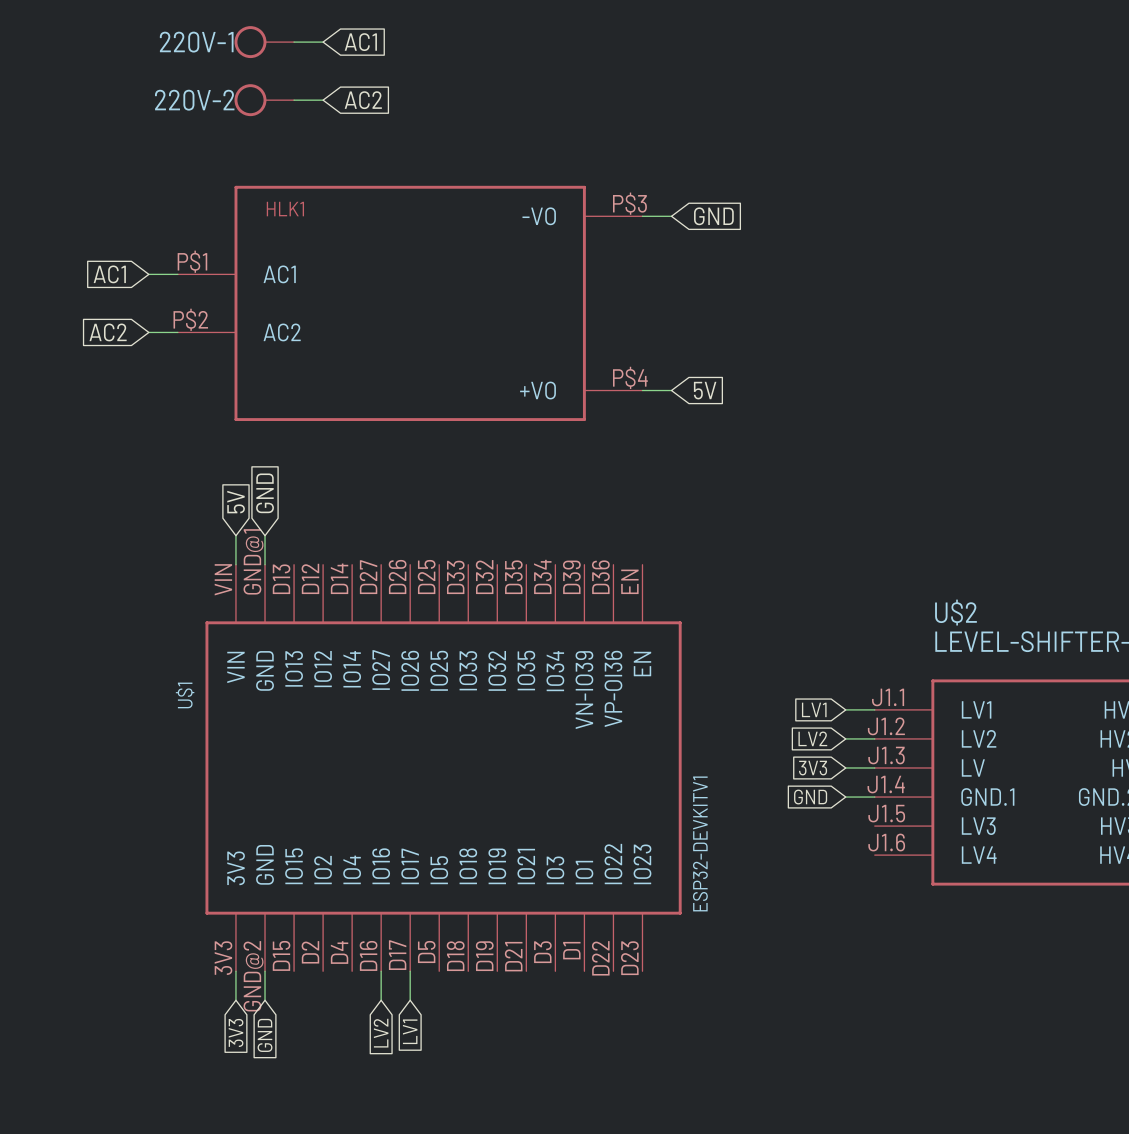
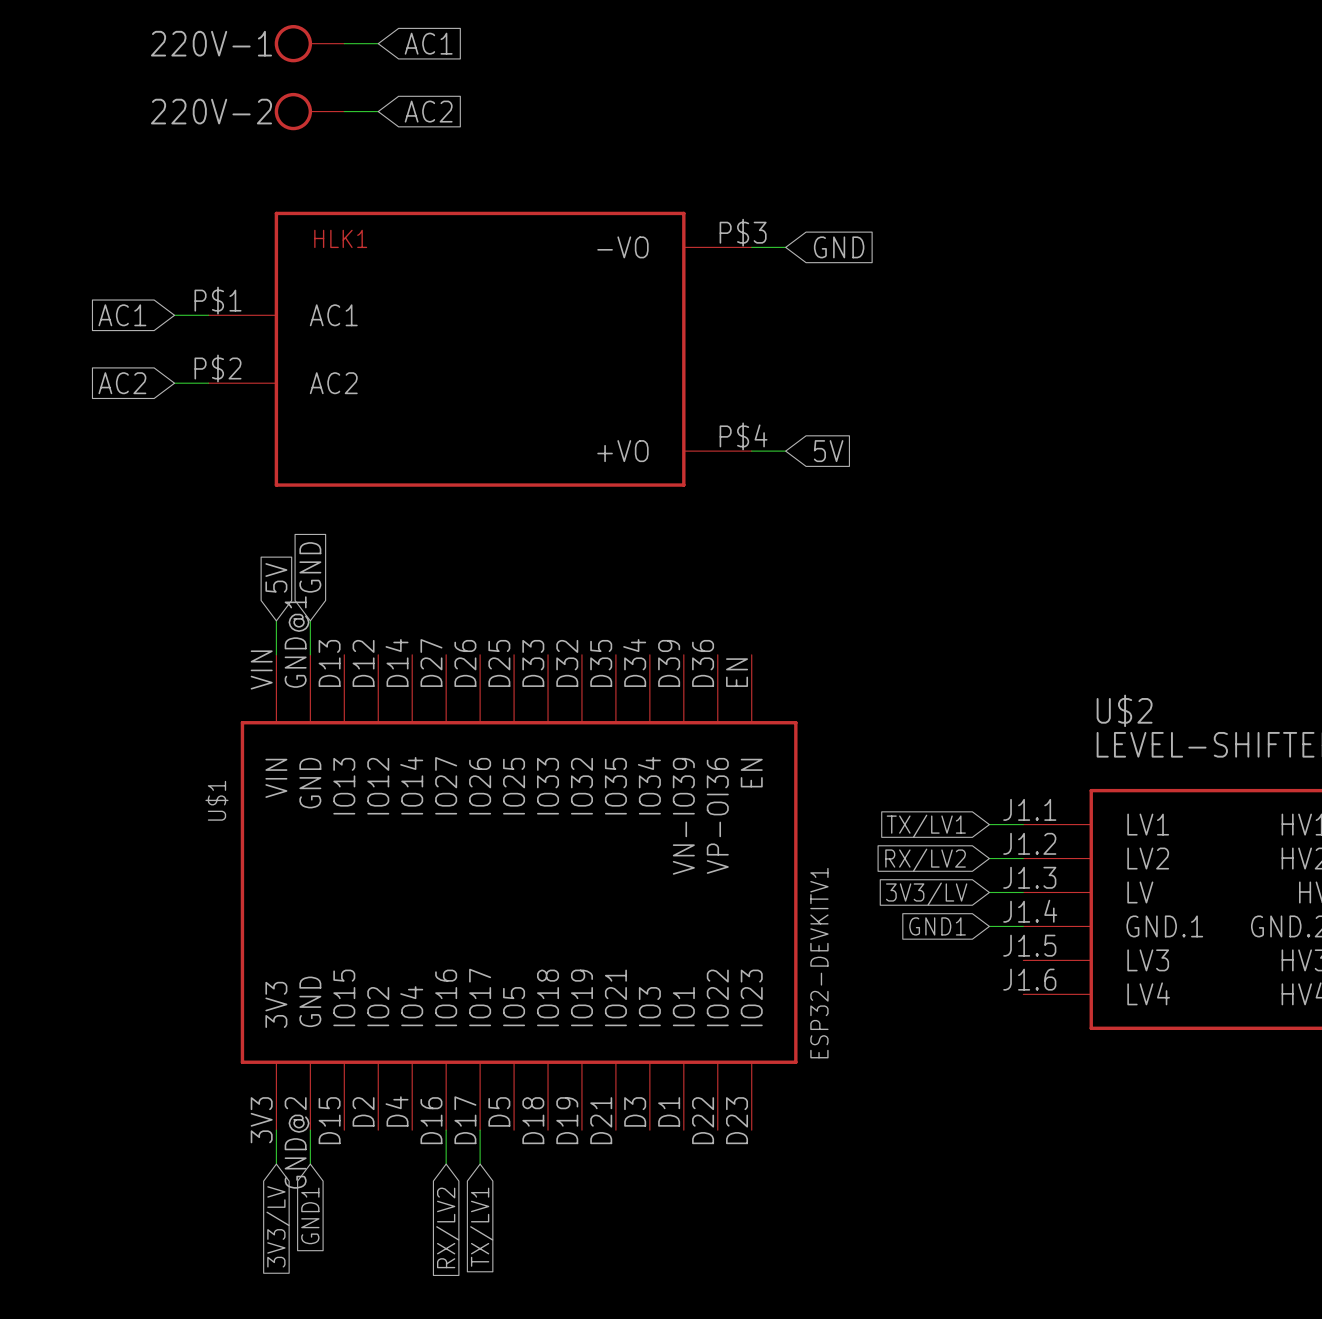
global label: LV1 (814, 709) -> TX/LV1 (926, 826)
global label: LV2 (812, 738) -> RX/LV2 (925, 860)
global label: 3V3 (813, 768) -> 3V3/LV (926, 894)
global label: GND (810, 797) -> GND1 (937, 926)
global label: LV1 (410, 1031) -> TX/LV1 (481, 1227)
global label: 3V3 (236, 1032) -> 3V3/LV (278, 1226)
global label: LV2 (381, 1033) -> RX/LV2 (447, 1227)
global label: GND (265, 1035) -> GND1 (310, 1215)

